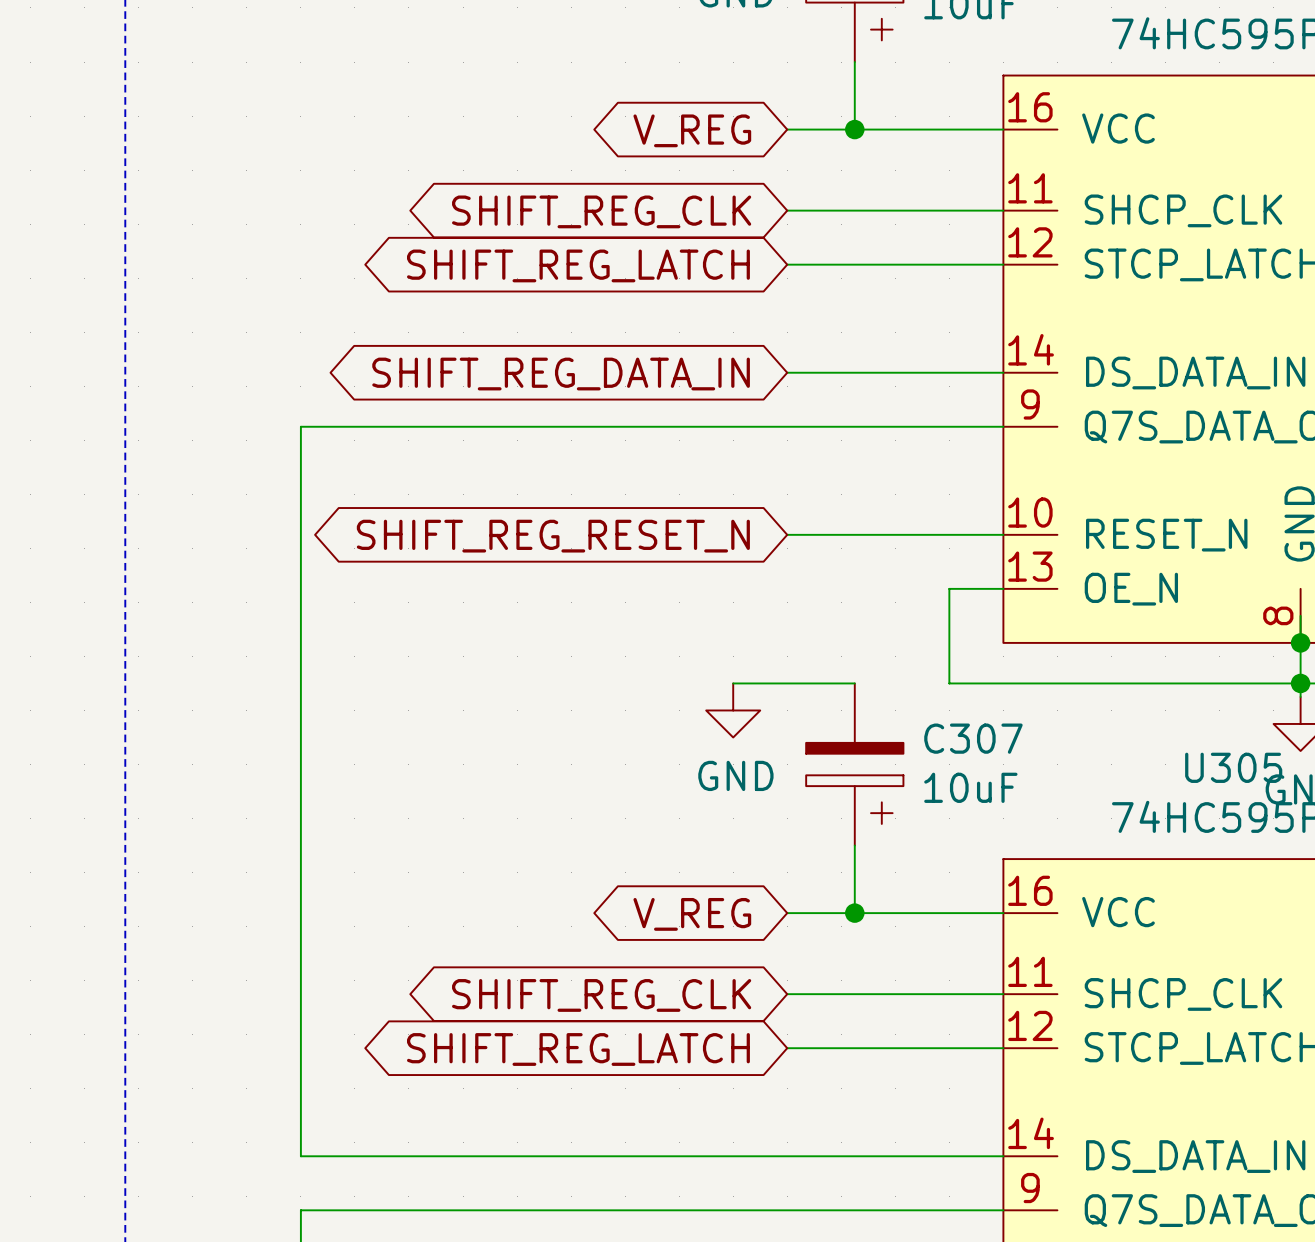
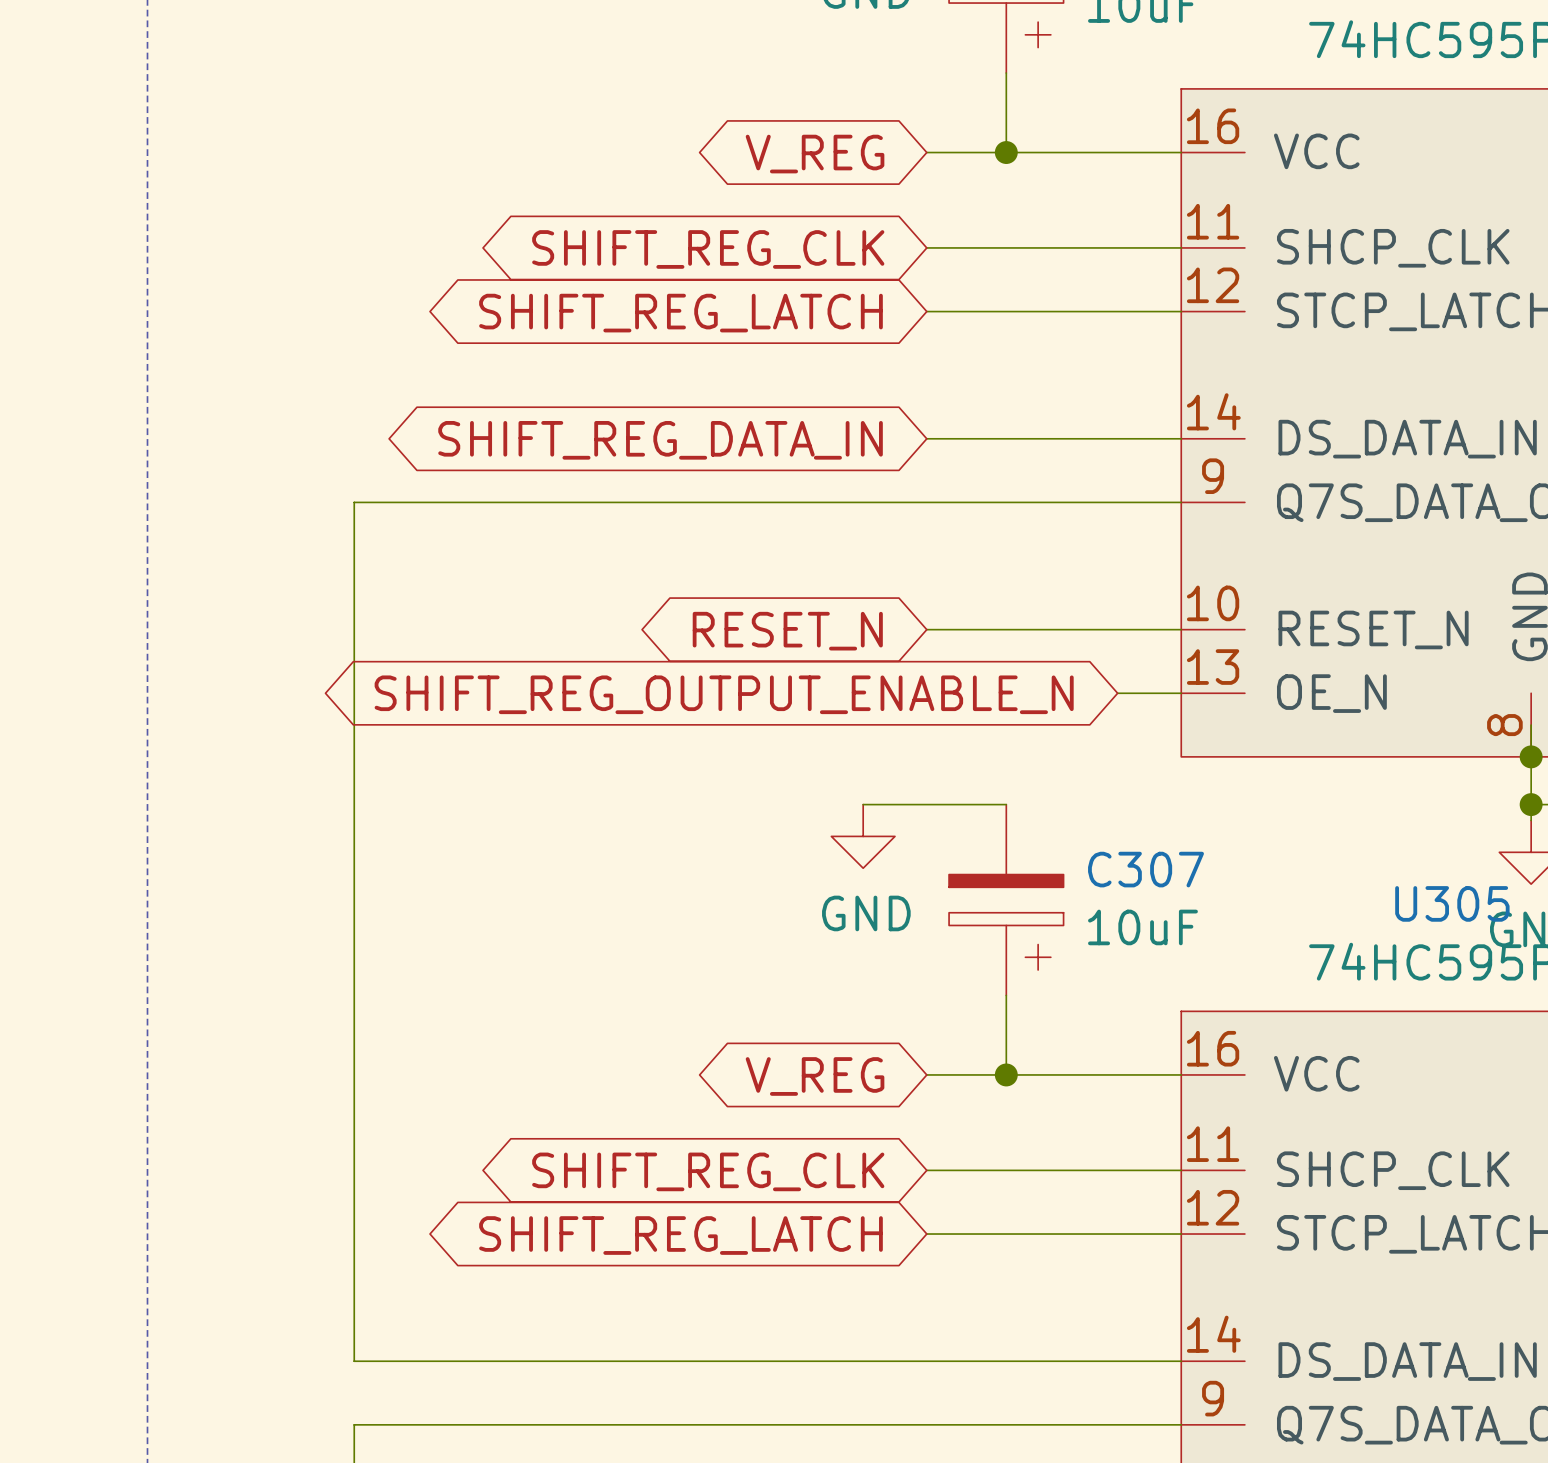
global label: SHIFT_REG_RESET_N (553, 536) -> RESET_N (787, 631)
wire: (949, 588) (949, 683) (1300, 683) -> none
global label: none -> SHIFT_REG_OUTPUT_ENABLE_N (724, 694)

